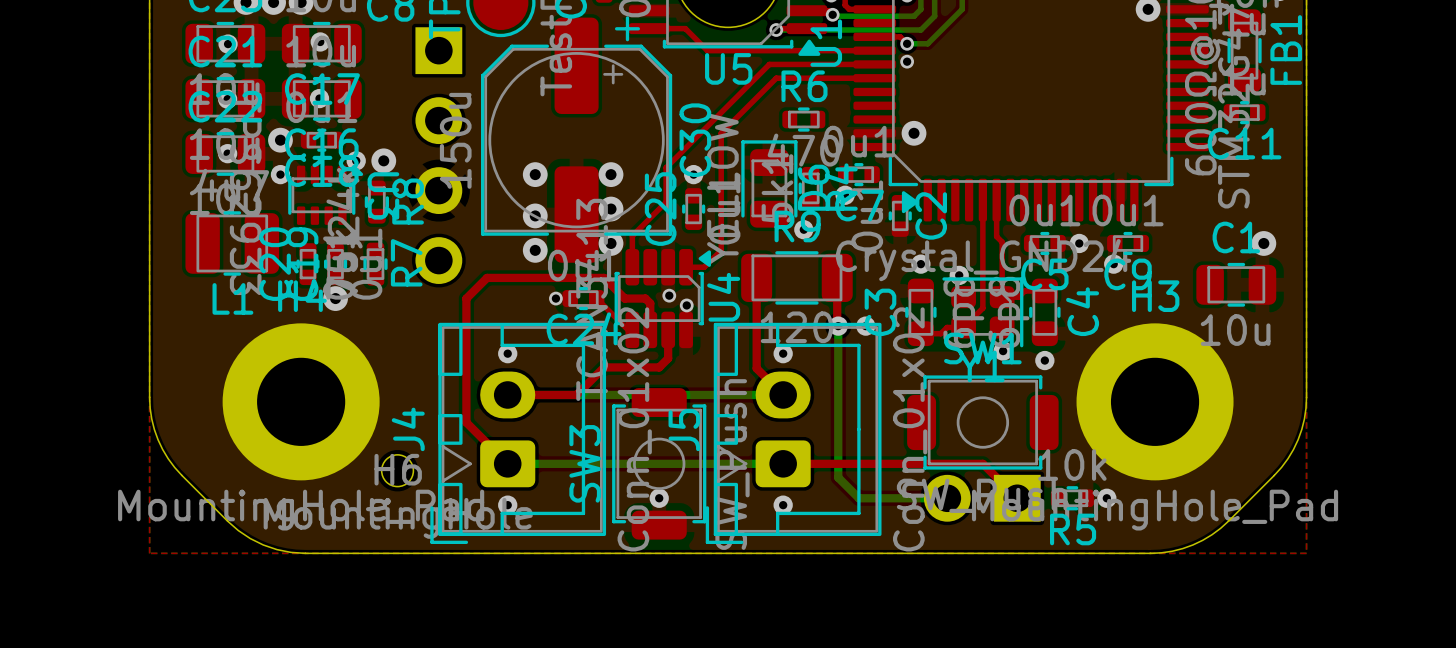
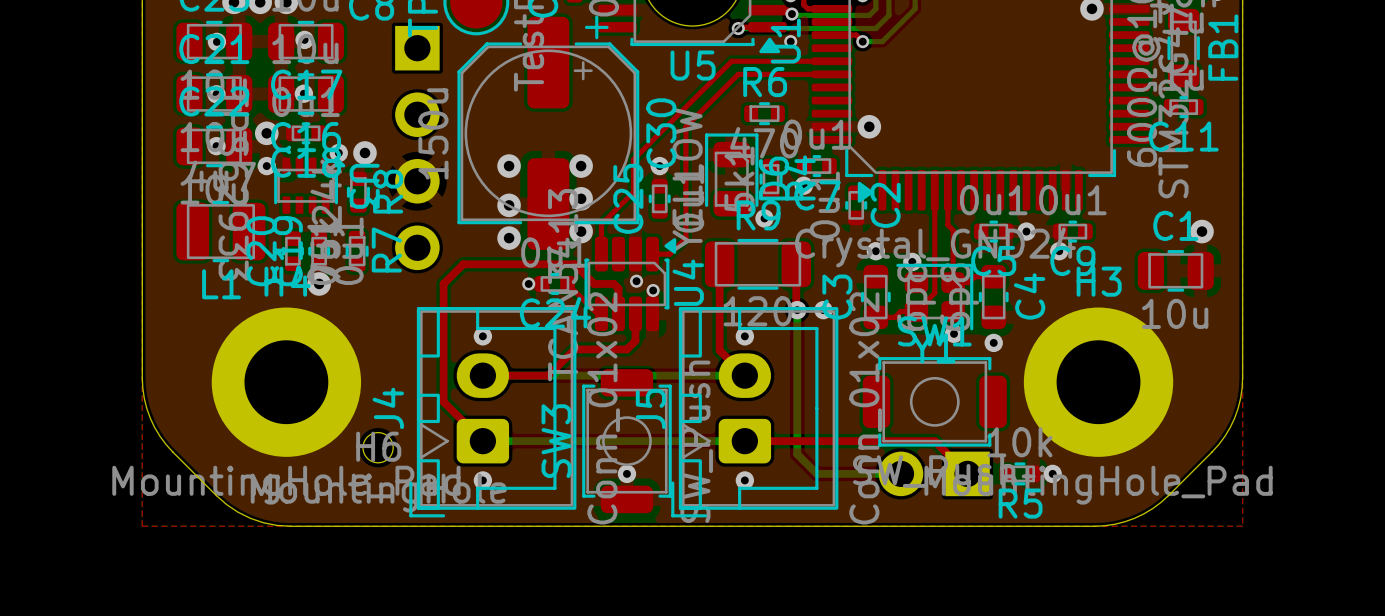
top track: (649, 28) (685, 28) (707, 50) (874, 50) -> none
via position: (907, 61) -> (790, 41)

